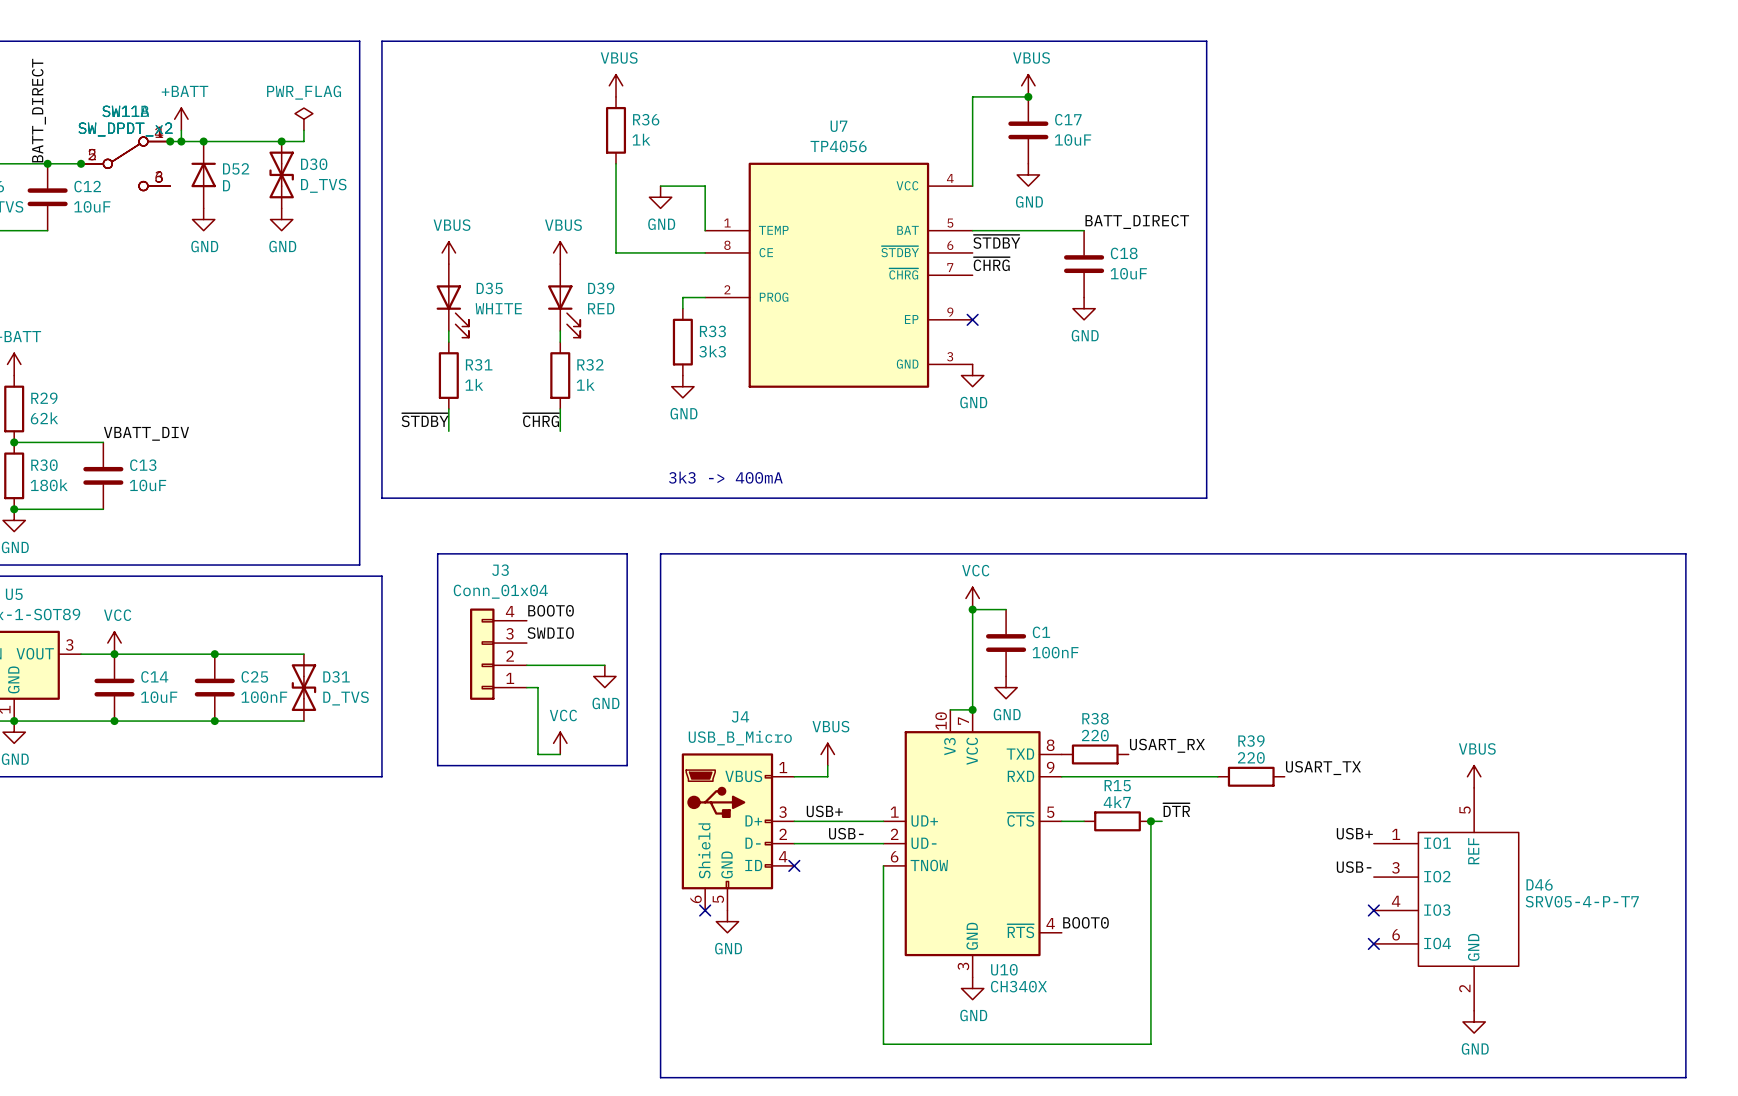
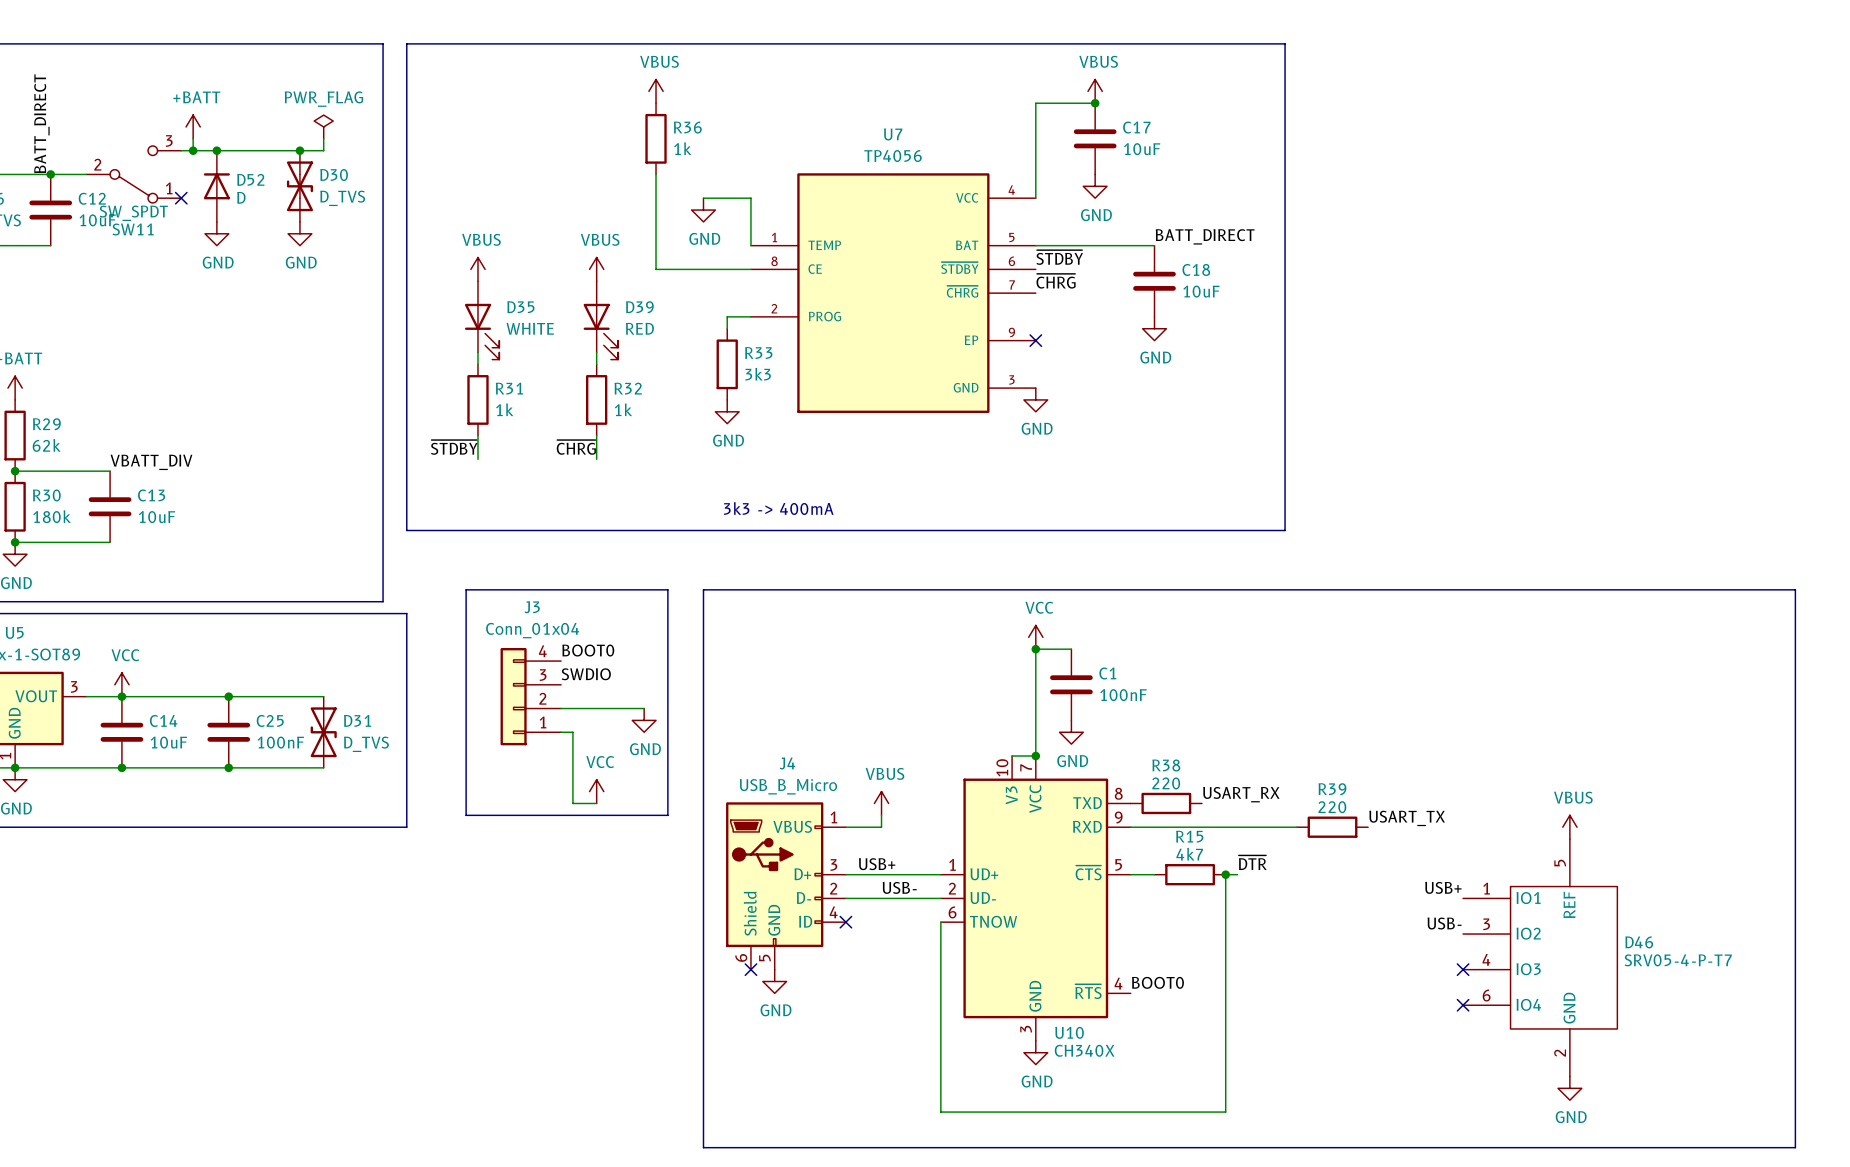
junction: (170, 141) -> none
junction: (81, 163) -> none
part: SW_DPDT_x2 (125, 163) -> none
part: SW_DPDT_x2 (125, 163) -> none
SW11: none -> SW_SPDT (133, 174)
no-connect mark: none -> (181, 198)

